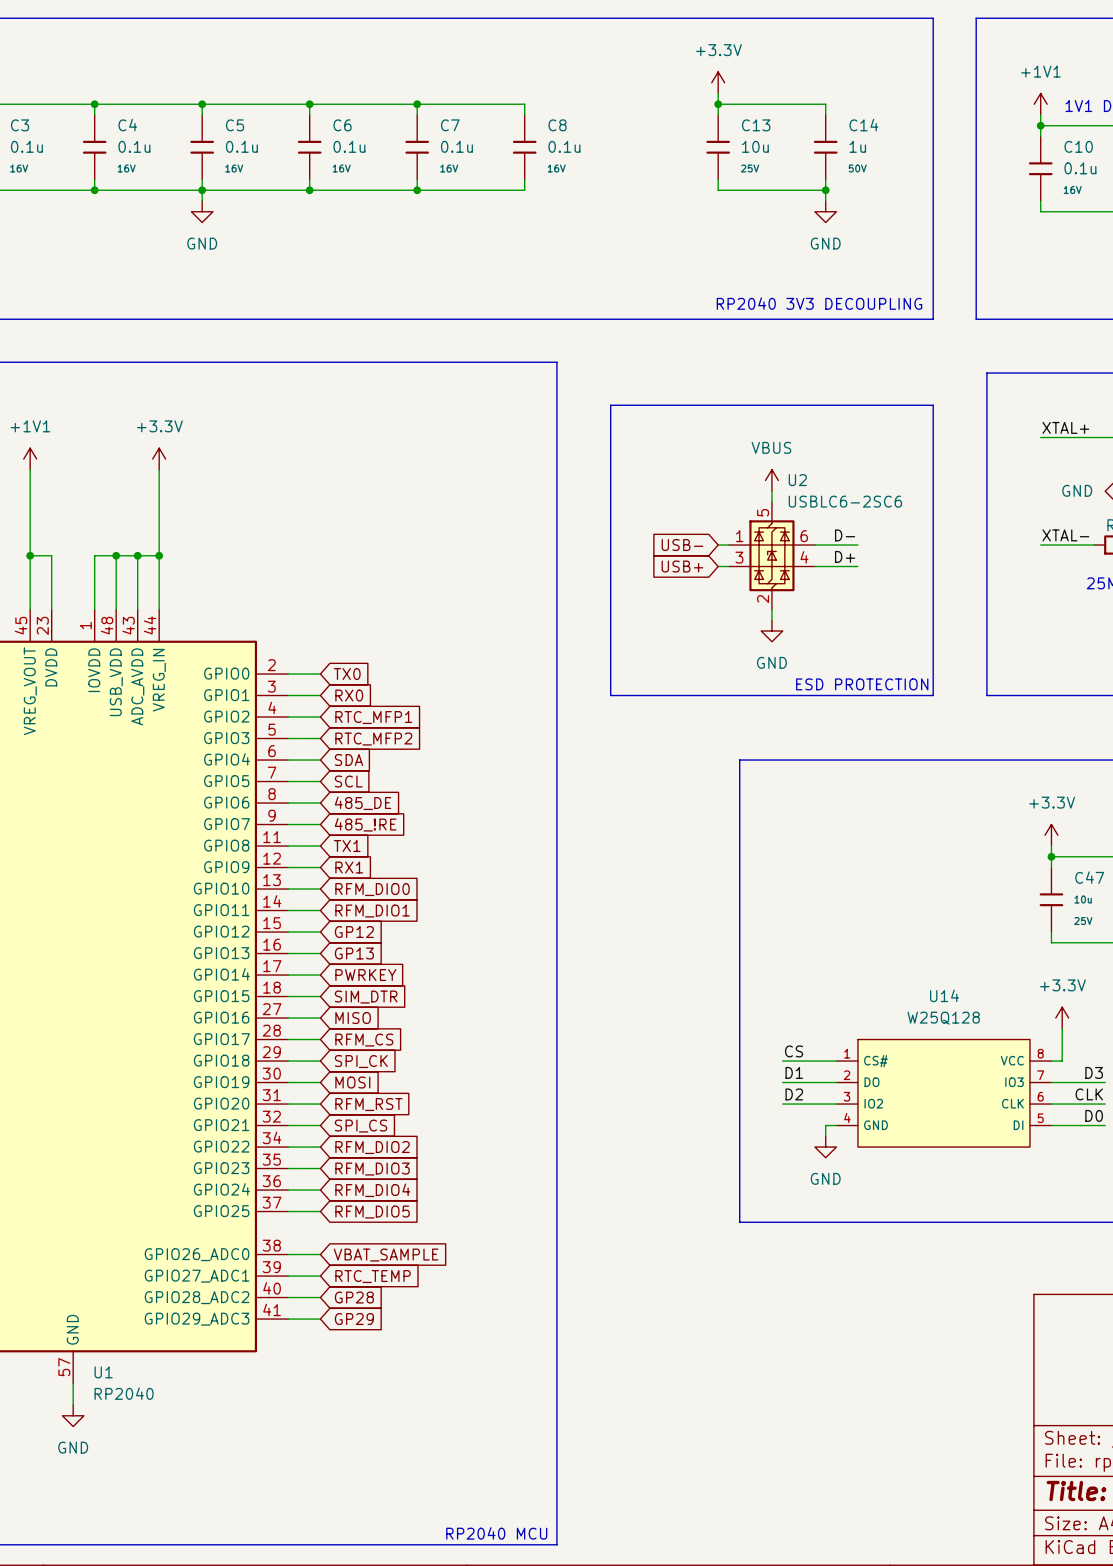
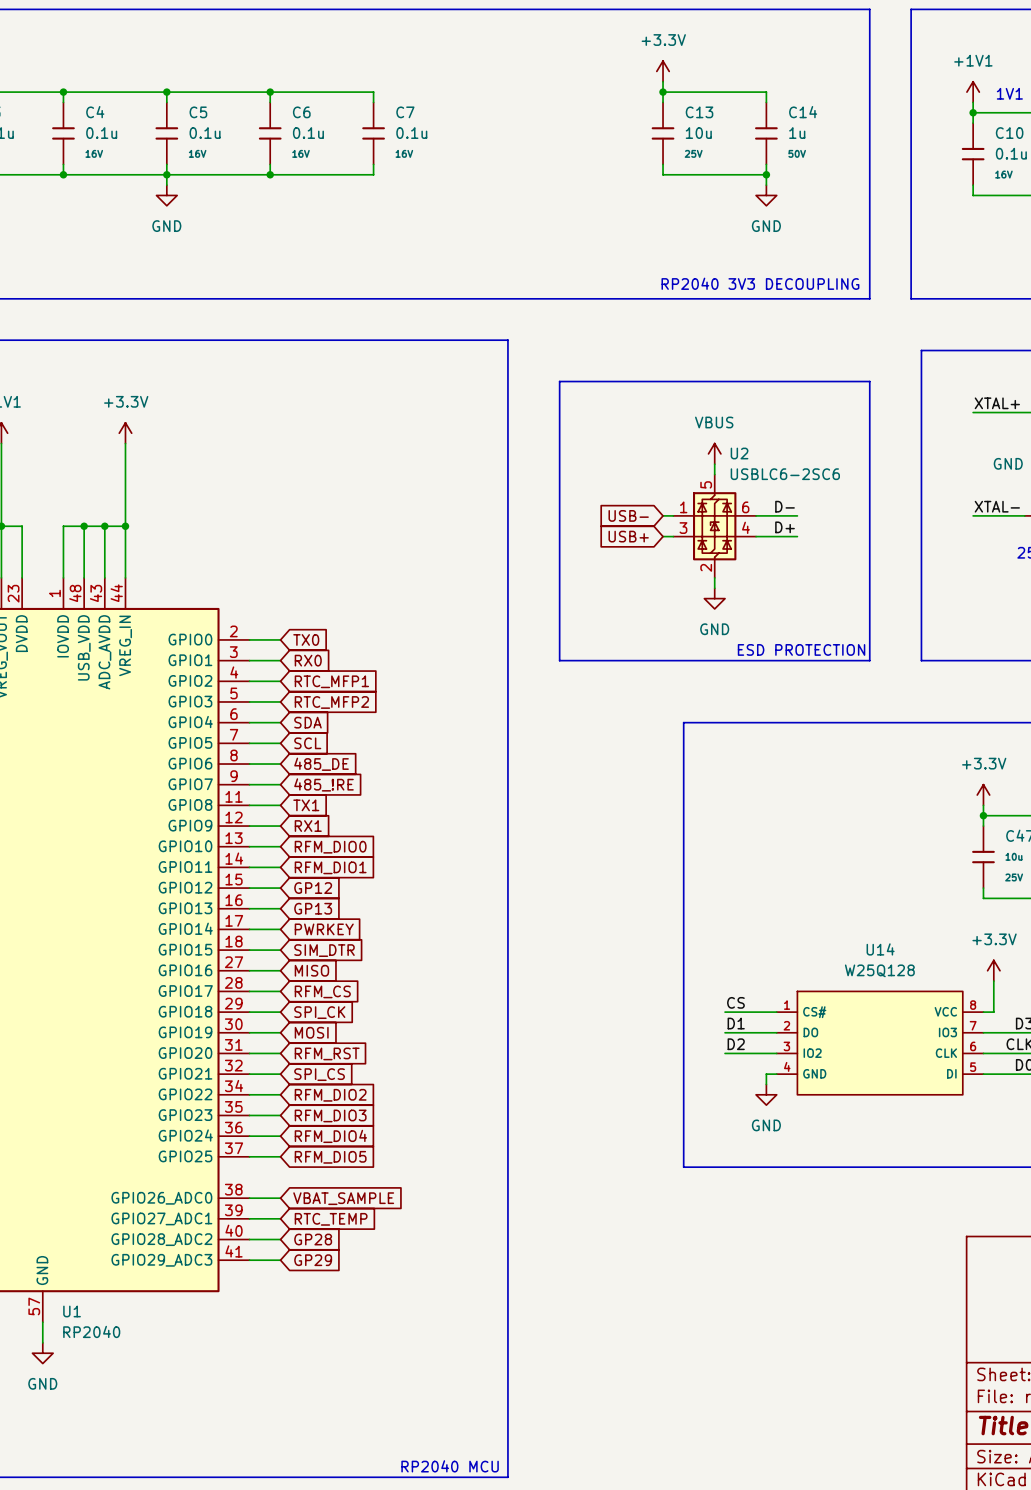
wire: (417, 104) (524, 104) (524, 115) -> none
junction: (417, 104) -> none
C8: 0.1u (524, 147) -> none
wire: (524, 179) (524, 190) (417, 190) -> none
junction: (417, 190) -> none

